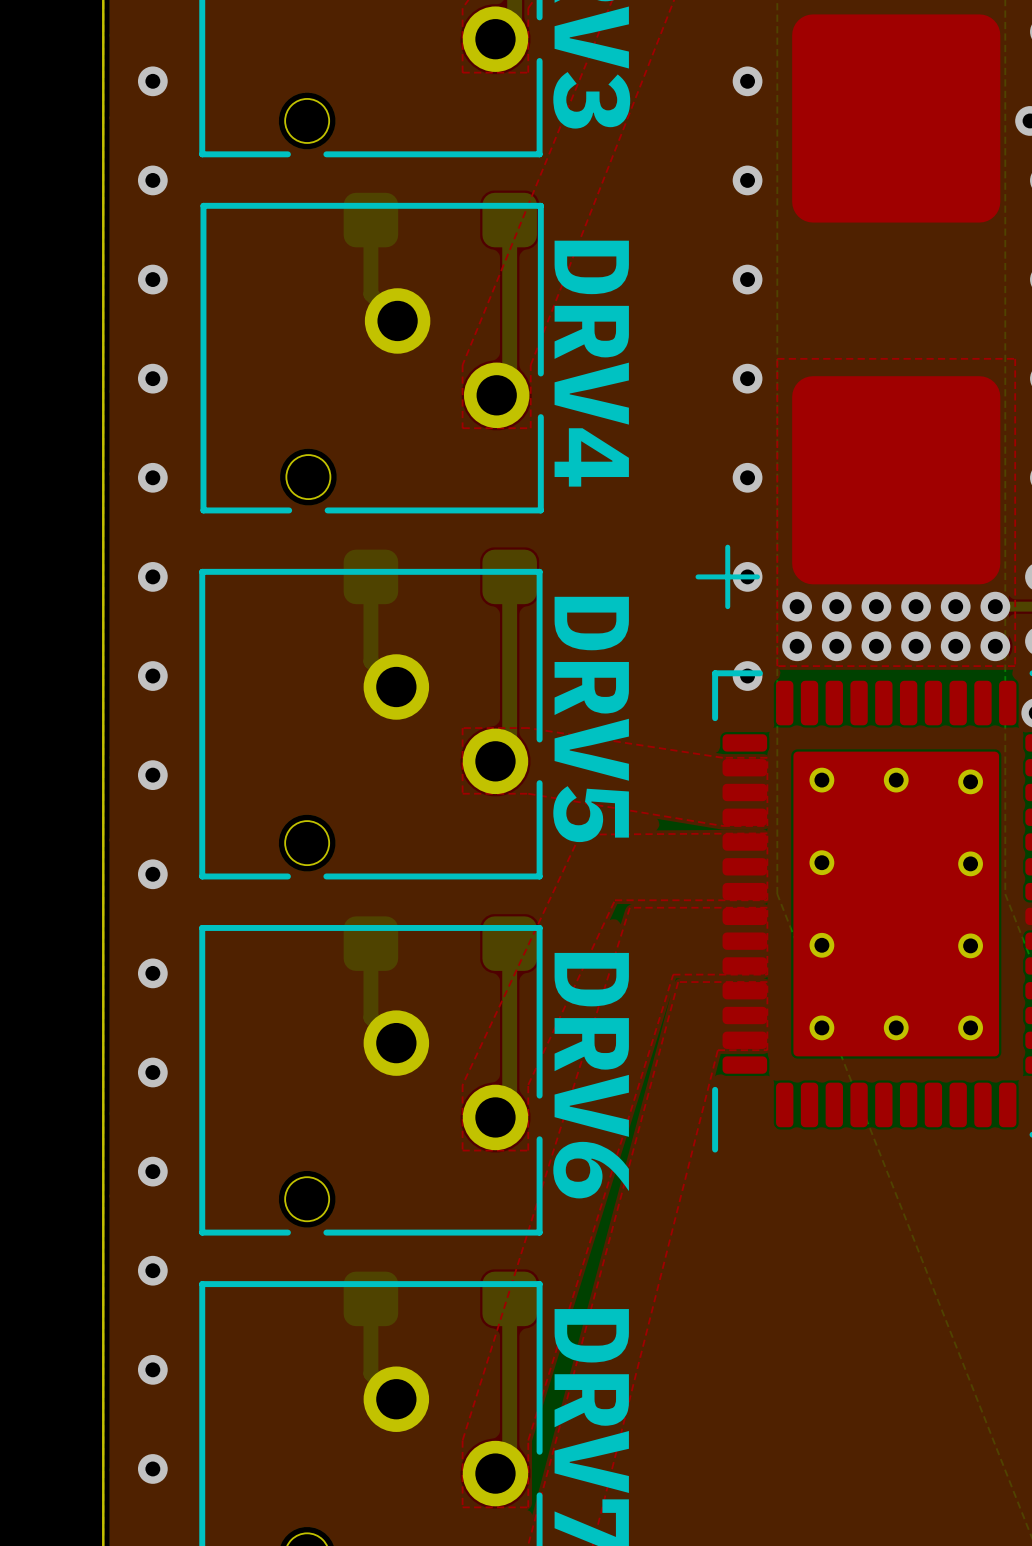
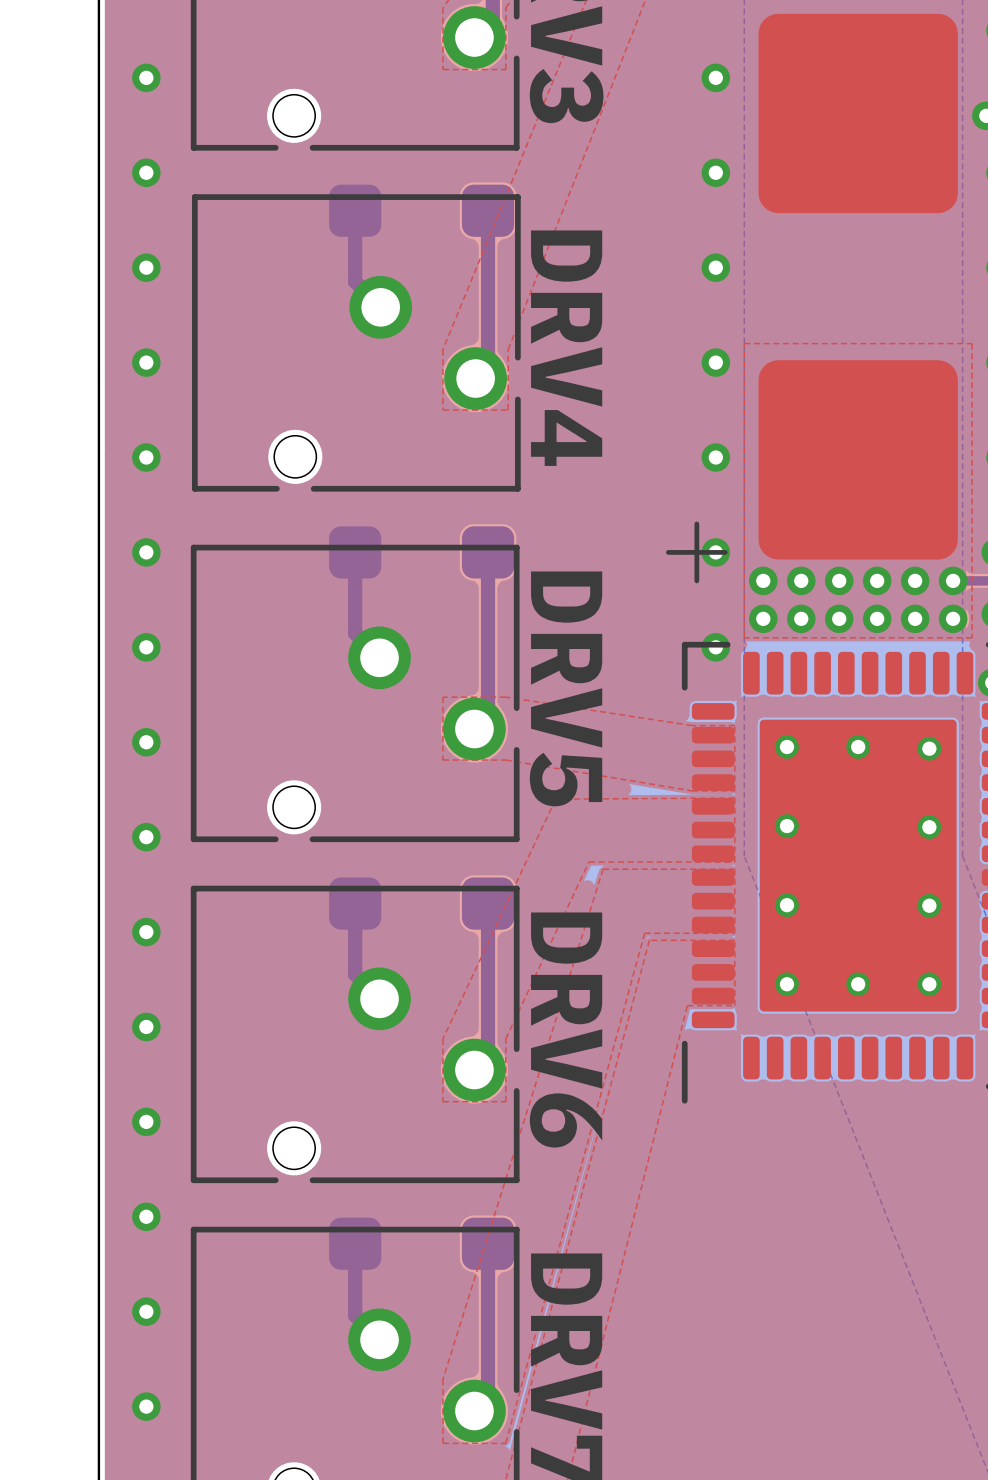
top zone outline: (673, 974) (528, 1440) (528, 1507) -> (644, 933) (505, 1443)

